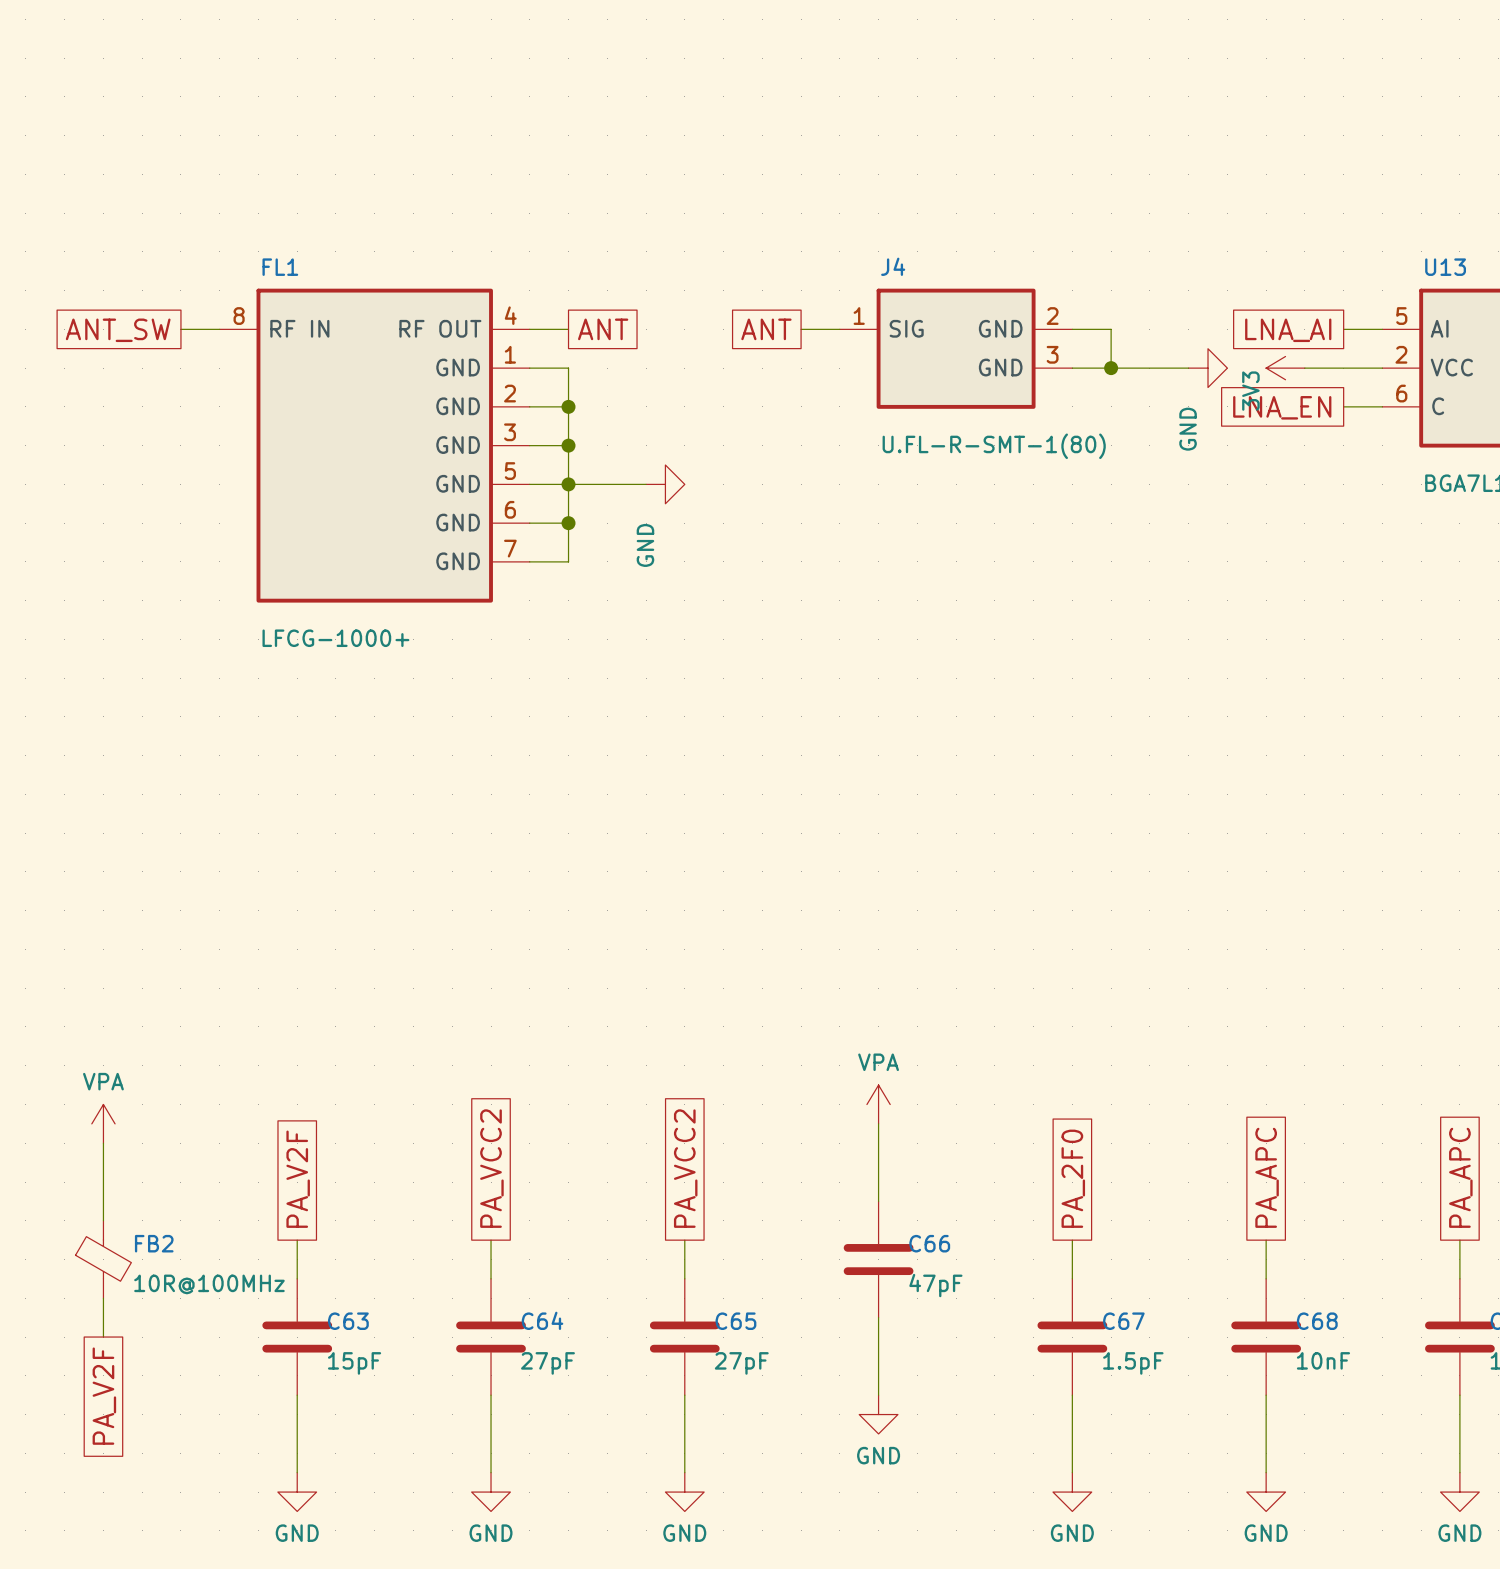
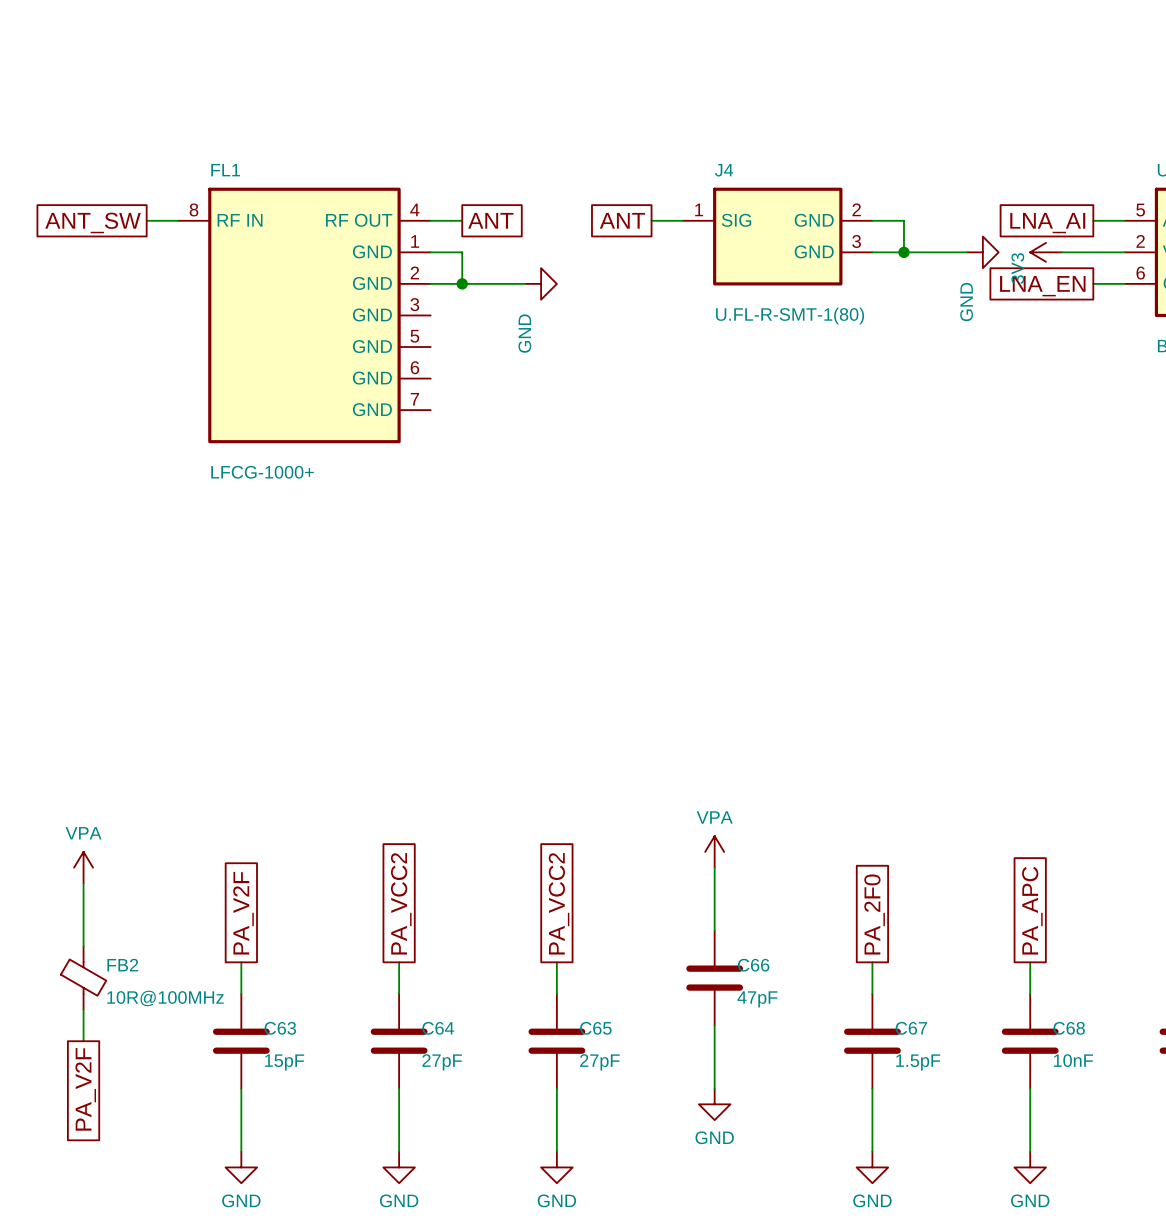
wire: (568, 406) (568, 561) (529, 561) -> (462, 283) (525, 283)
wire: (529, 445) (568, 445) -> none
junction: (568, 445) -> none
wire: (529, 484) (646, 484) -> none
junction: (568, 484) -> none
power symbol position: GND (665, 484) -> GND (541, 283)
wire: (529, 523) (568, 523) -> none
junction: (568, 523) -> none

